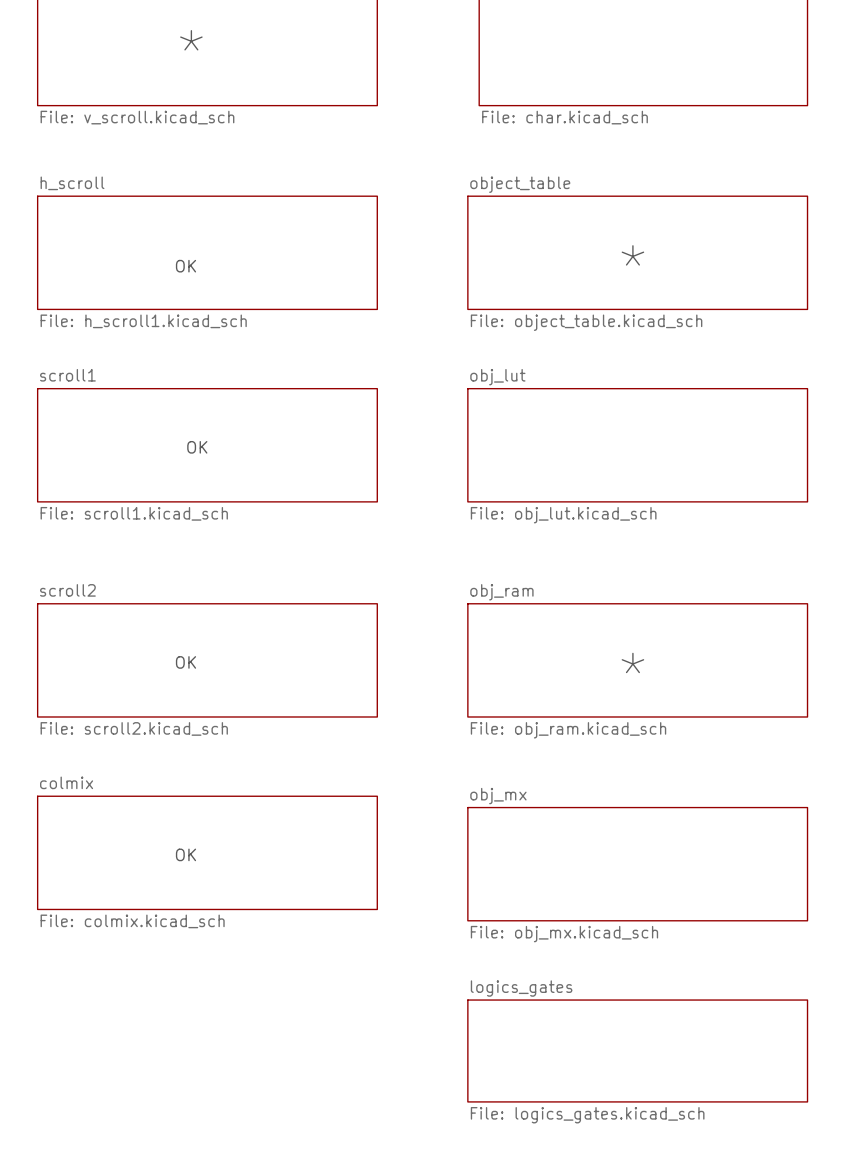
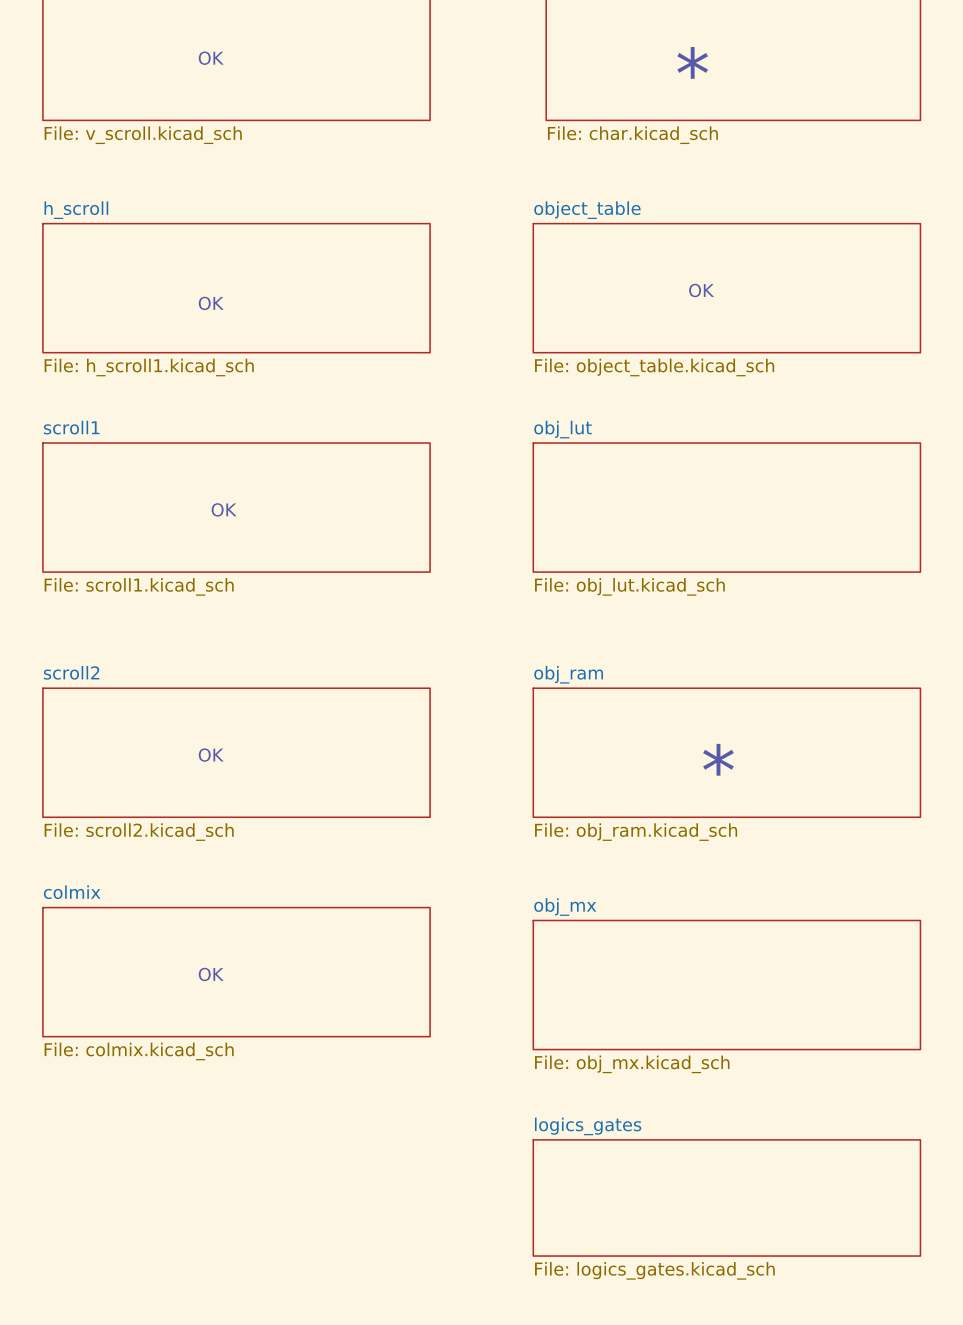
text: * (191, 40) -> none
text: none -> OK (211, 58)
text: none -> OK (701, 290)
text position: * (632, 255) -> * (692, 62)

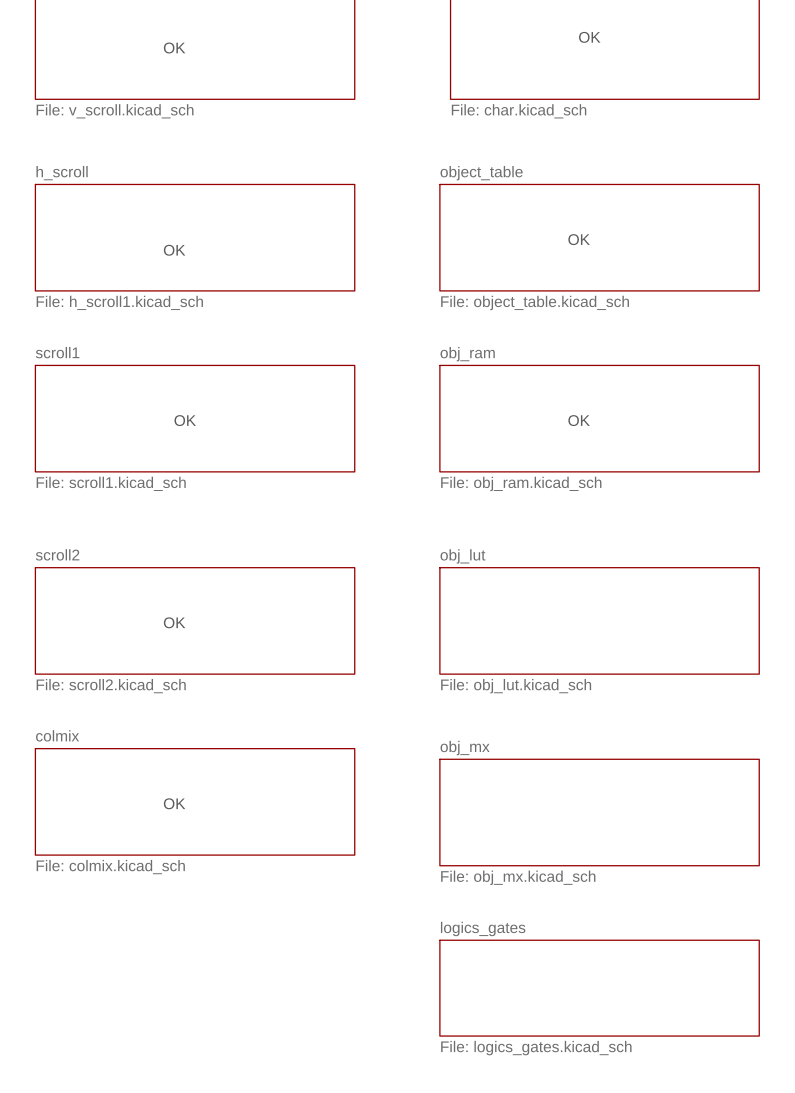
text: none -> OK (589, 37)
text: * (692, 62) -> none
sheet obj_lut name: obj_lut (563, 429) -> obj_ram (467, 354)
text: none -> OK (579, 420)
sheet obj_lut value: File: obj_lut.kicad_sch (629, 586) -> File: obj_ram.kicad_sch (521, 483)
sheet obj_ram name: obj_ram (568, 674) -> obj_lut (462, 556)
text: * (718, 759) -> none
sheet obj_ram value: File: obj_ram.kicad_sch (636, 832) -> File: obj_lut.kicad_sch (516, 686)

